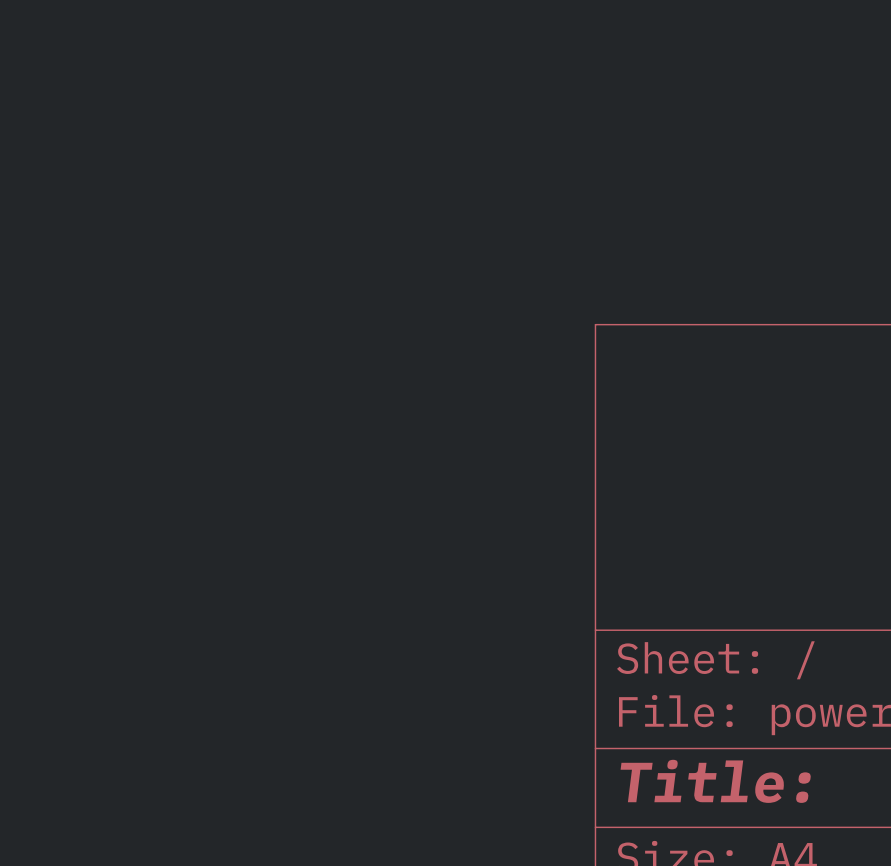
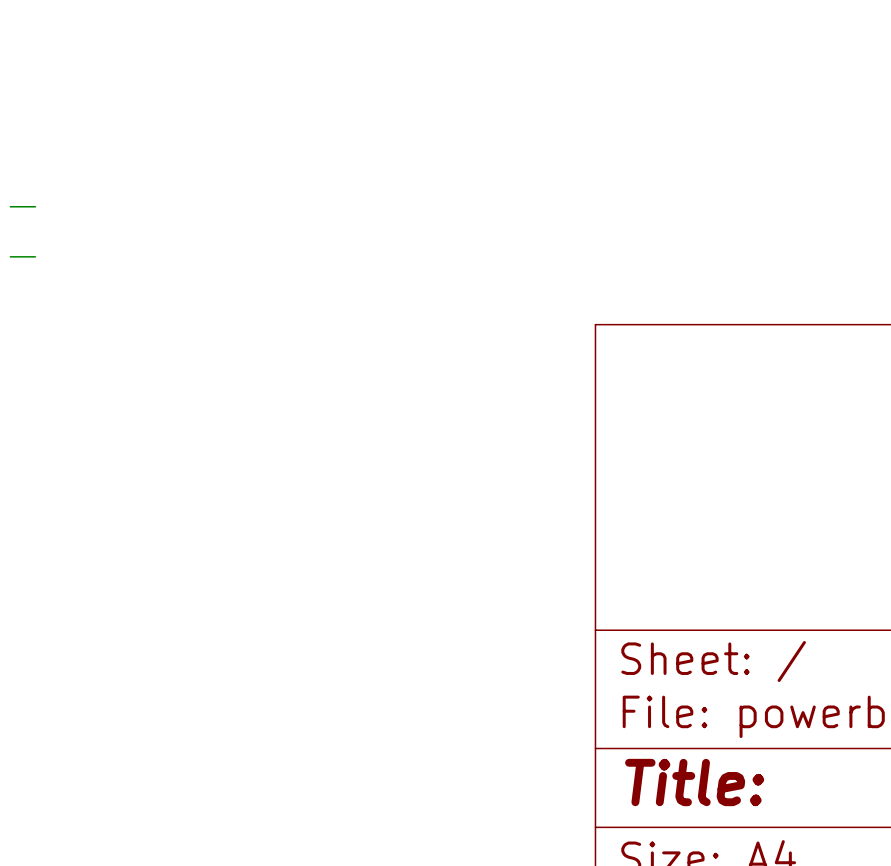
wire: none -> (10, 206) (35, 206)
wire: none -> (10, 256) (35, 256)

